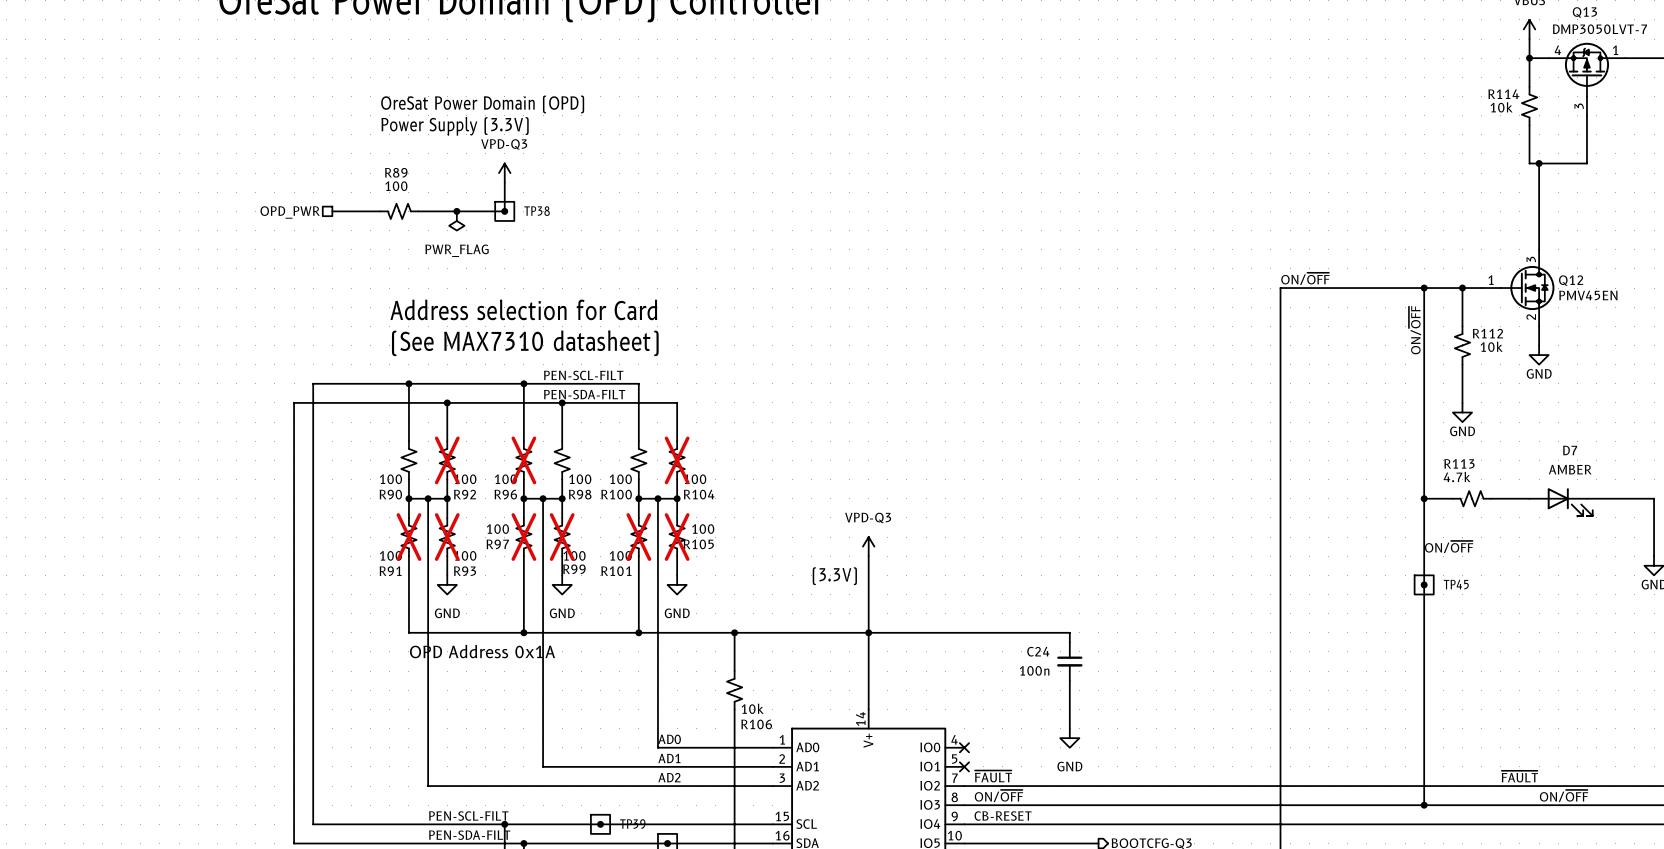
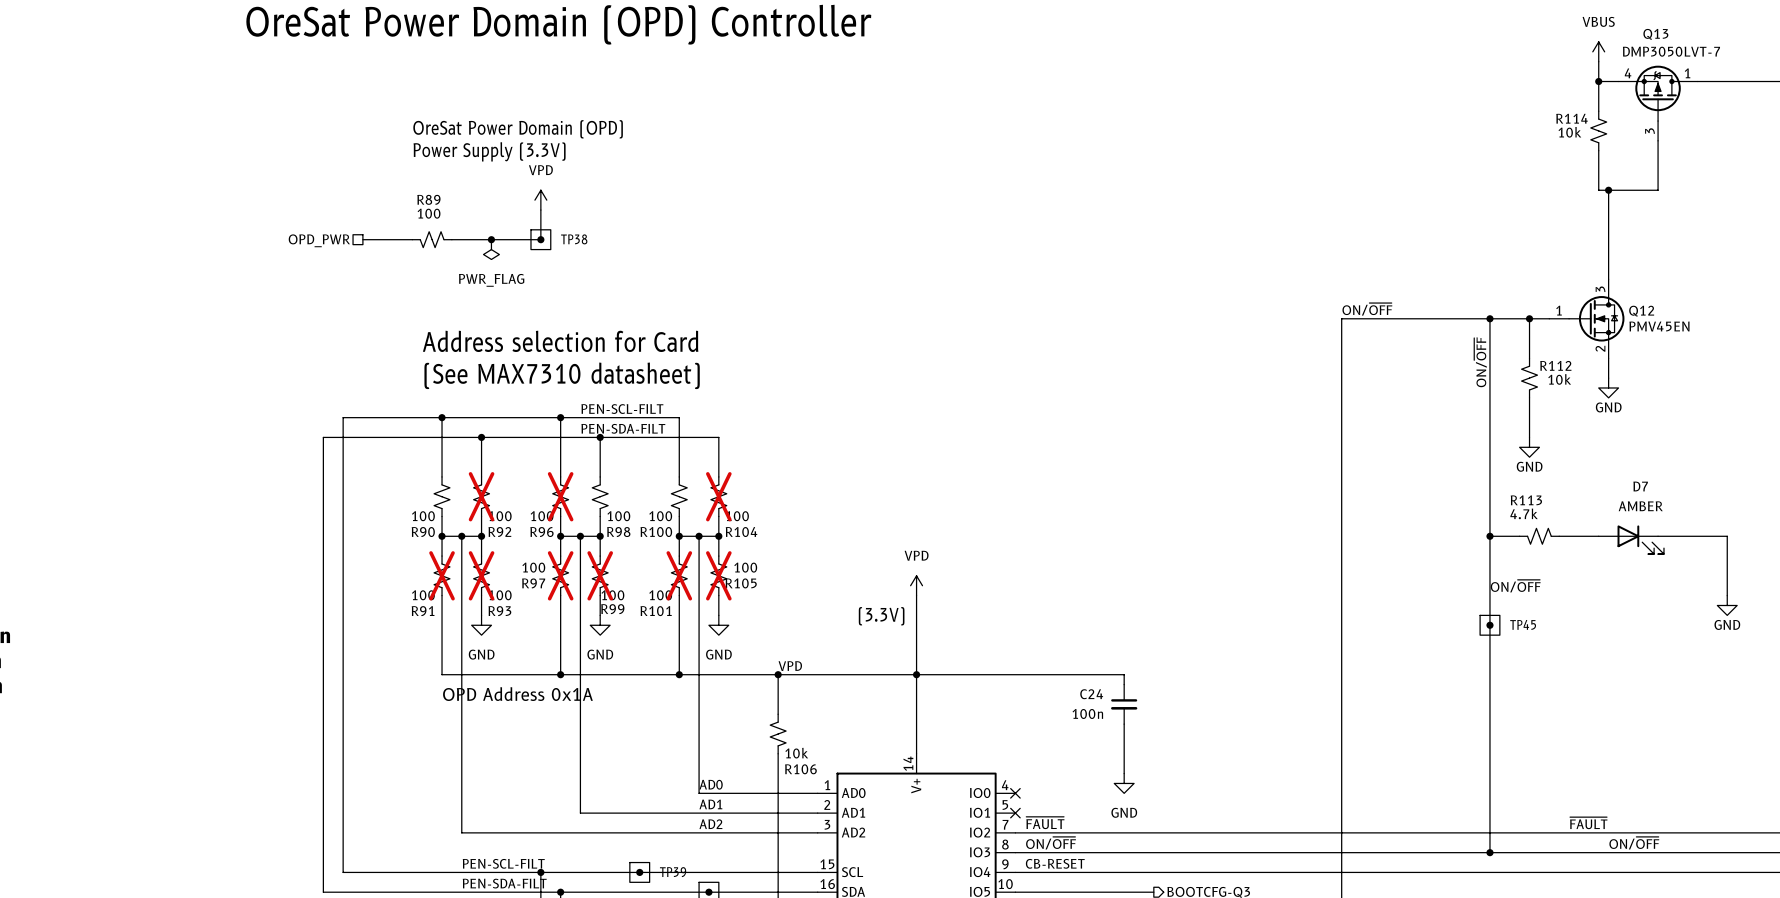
power symbol: VPD-Q3 (504, 173) -> VPD (540, 200)
power symbol: VPD-Q3 (868, 546) -> VPD (916, 585)
label: none -> VPD (790, 666)

